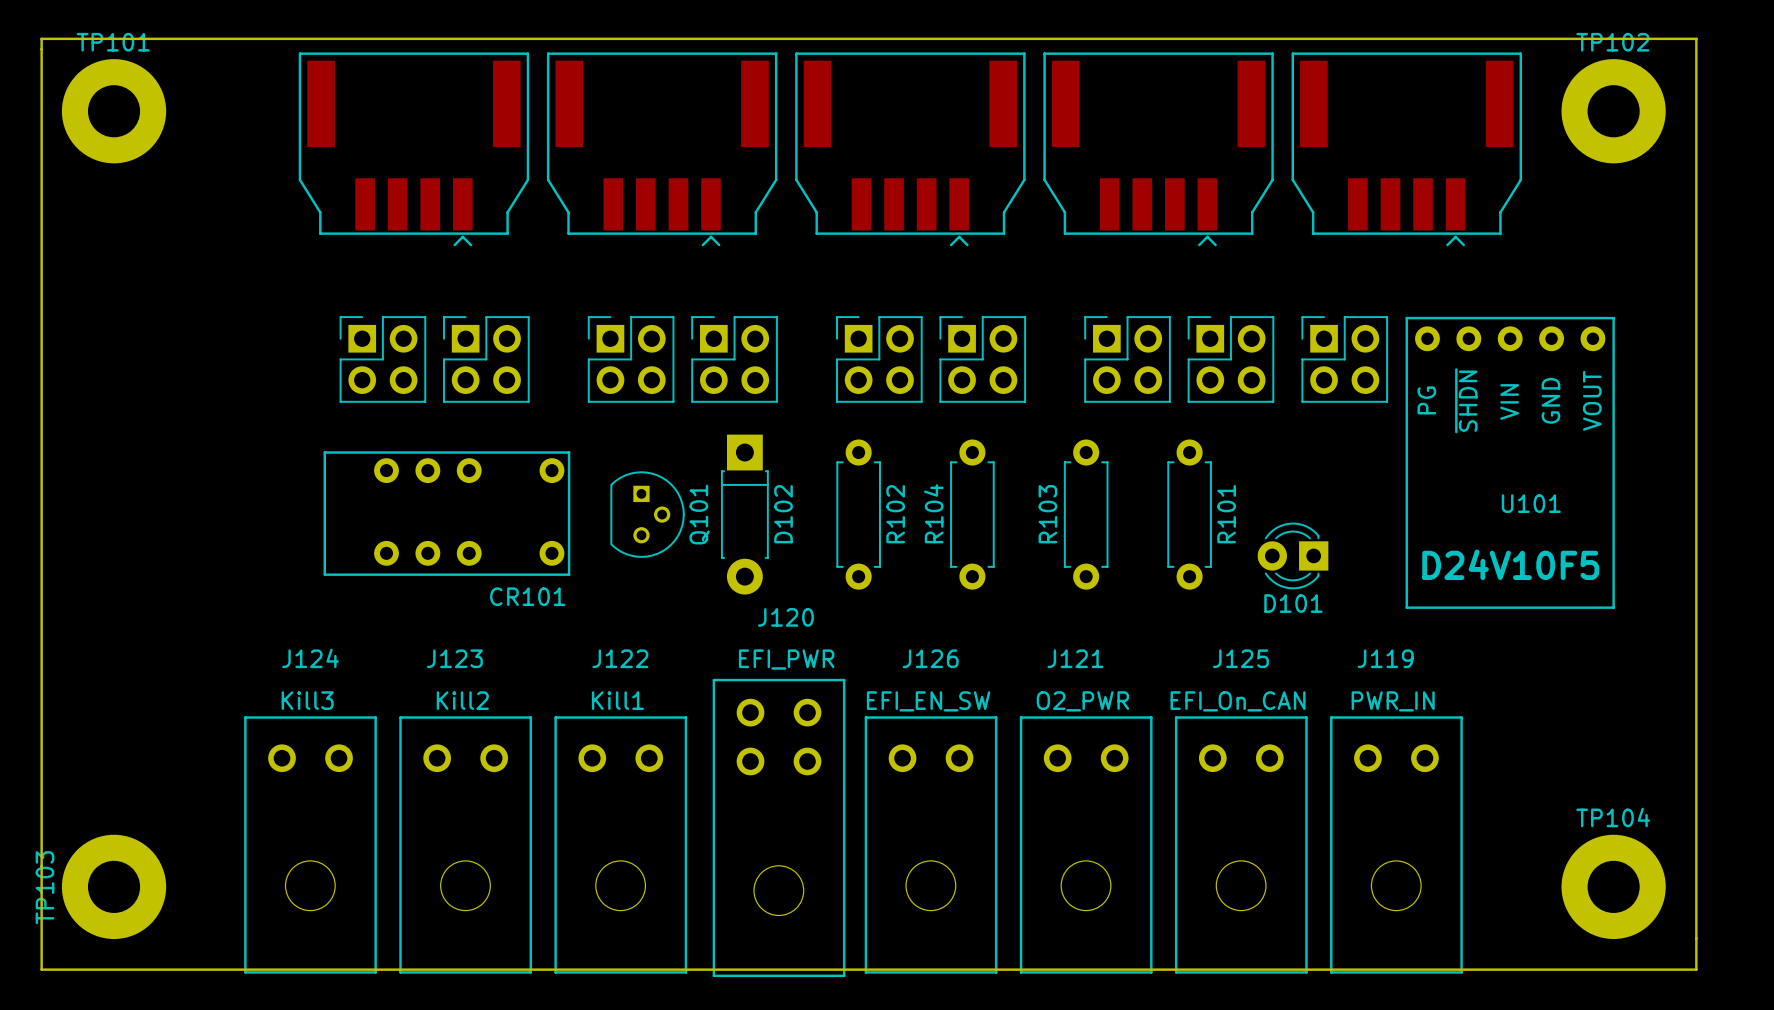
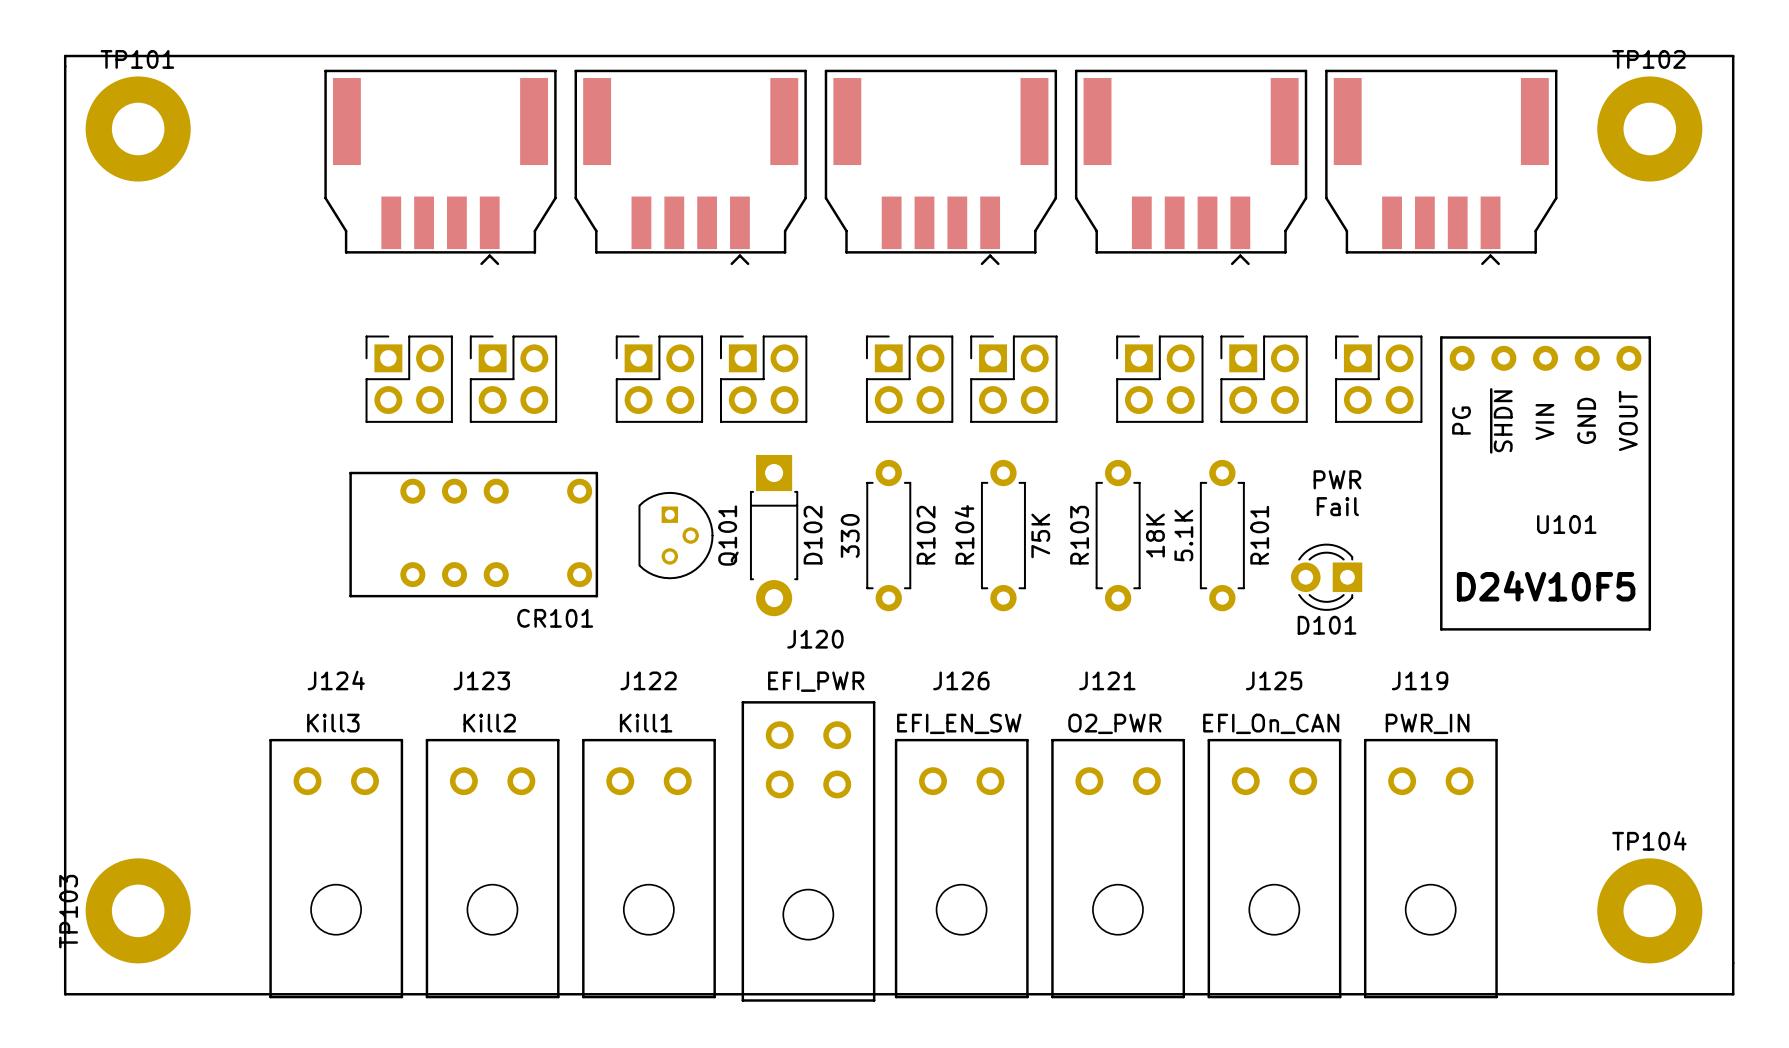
text: none -> PWR (1337, 479)
text: none -> Fail (1337, 506)
R102 value: none -> 330 (850, 535)
R104 value: none -> 75K (1040, 535)
R103 value: none -> 18K (1155, 535)
R101 value: none -> 5.1K (1183, 535)

